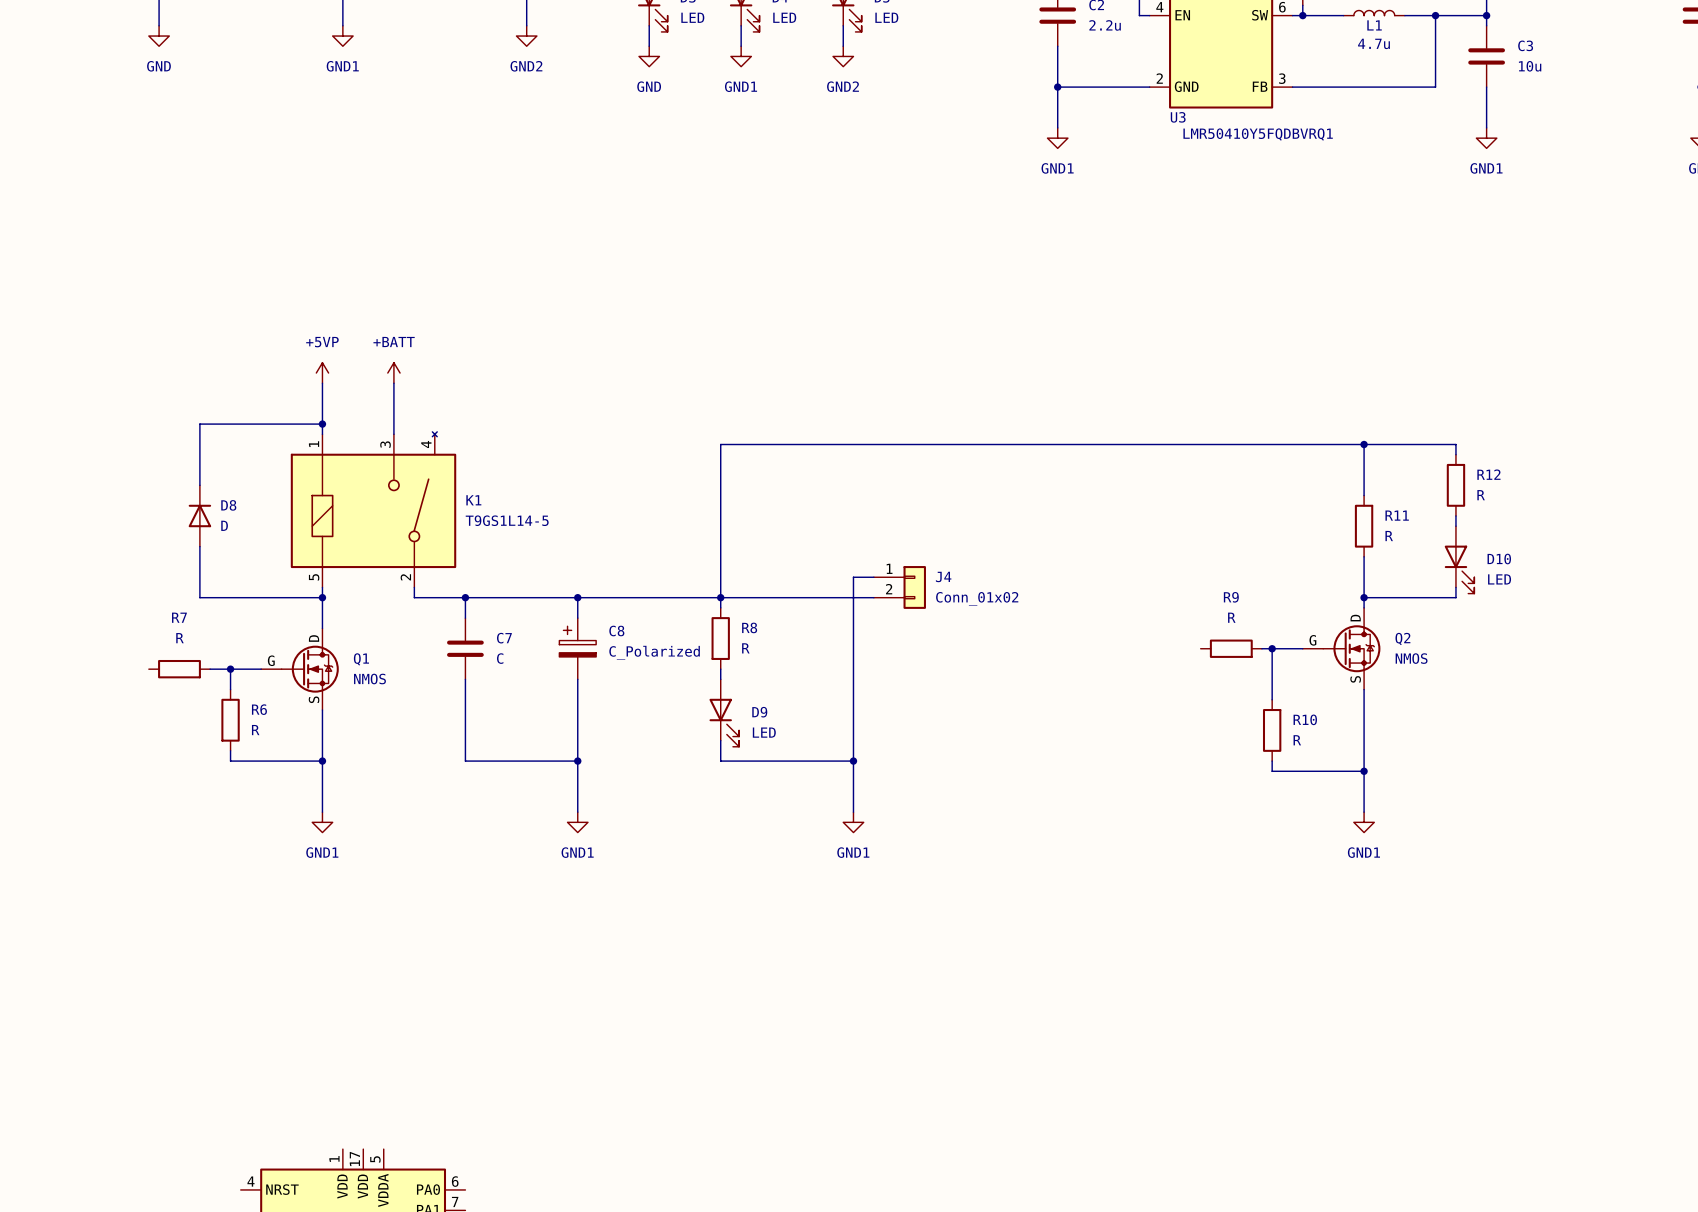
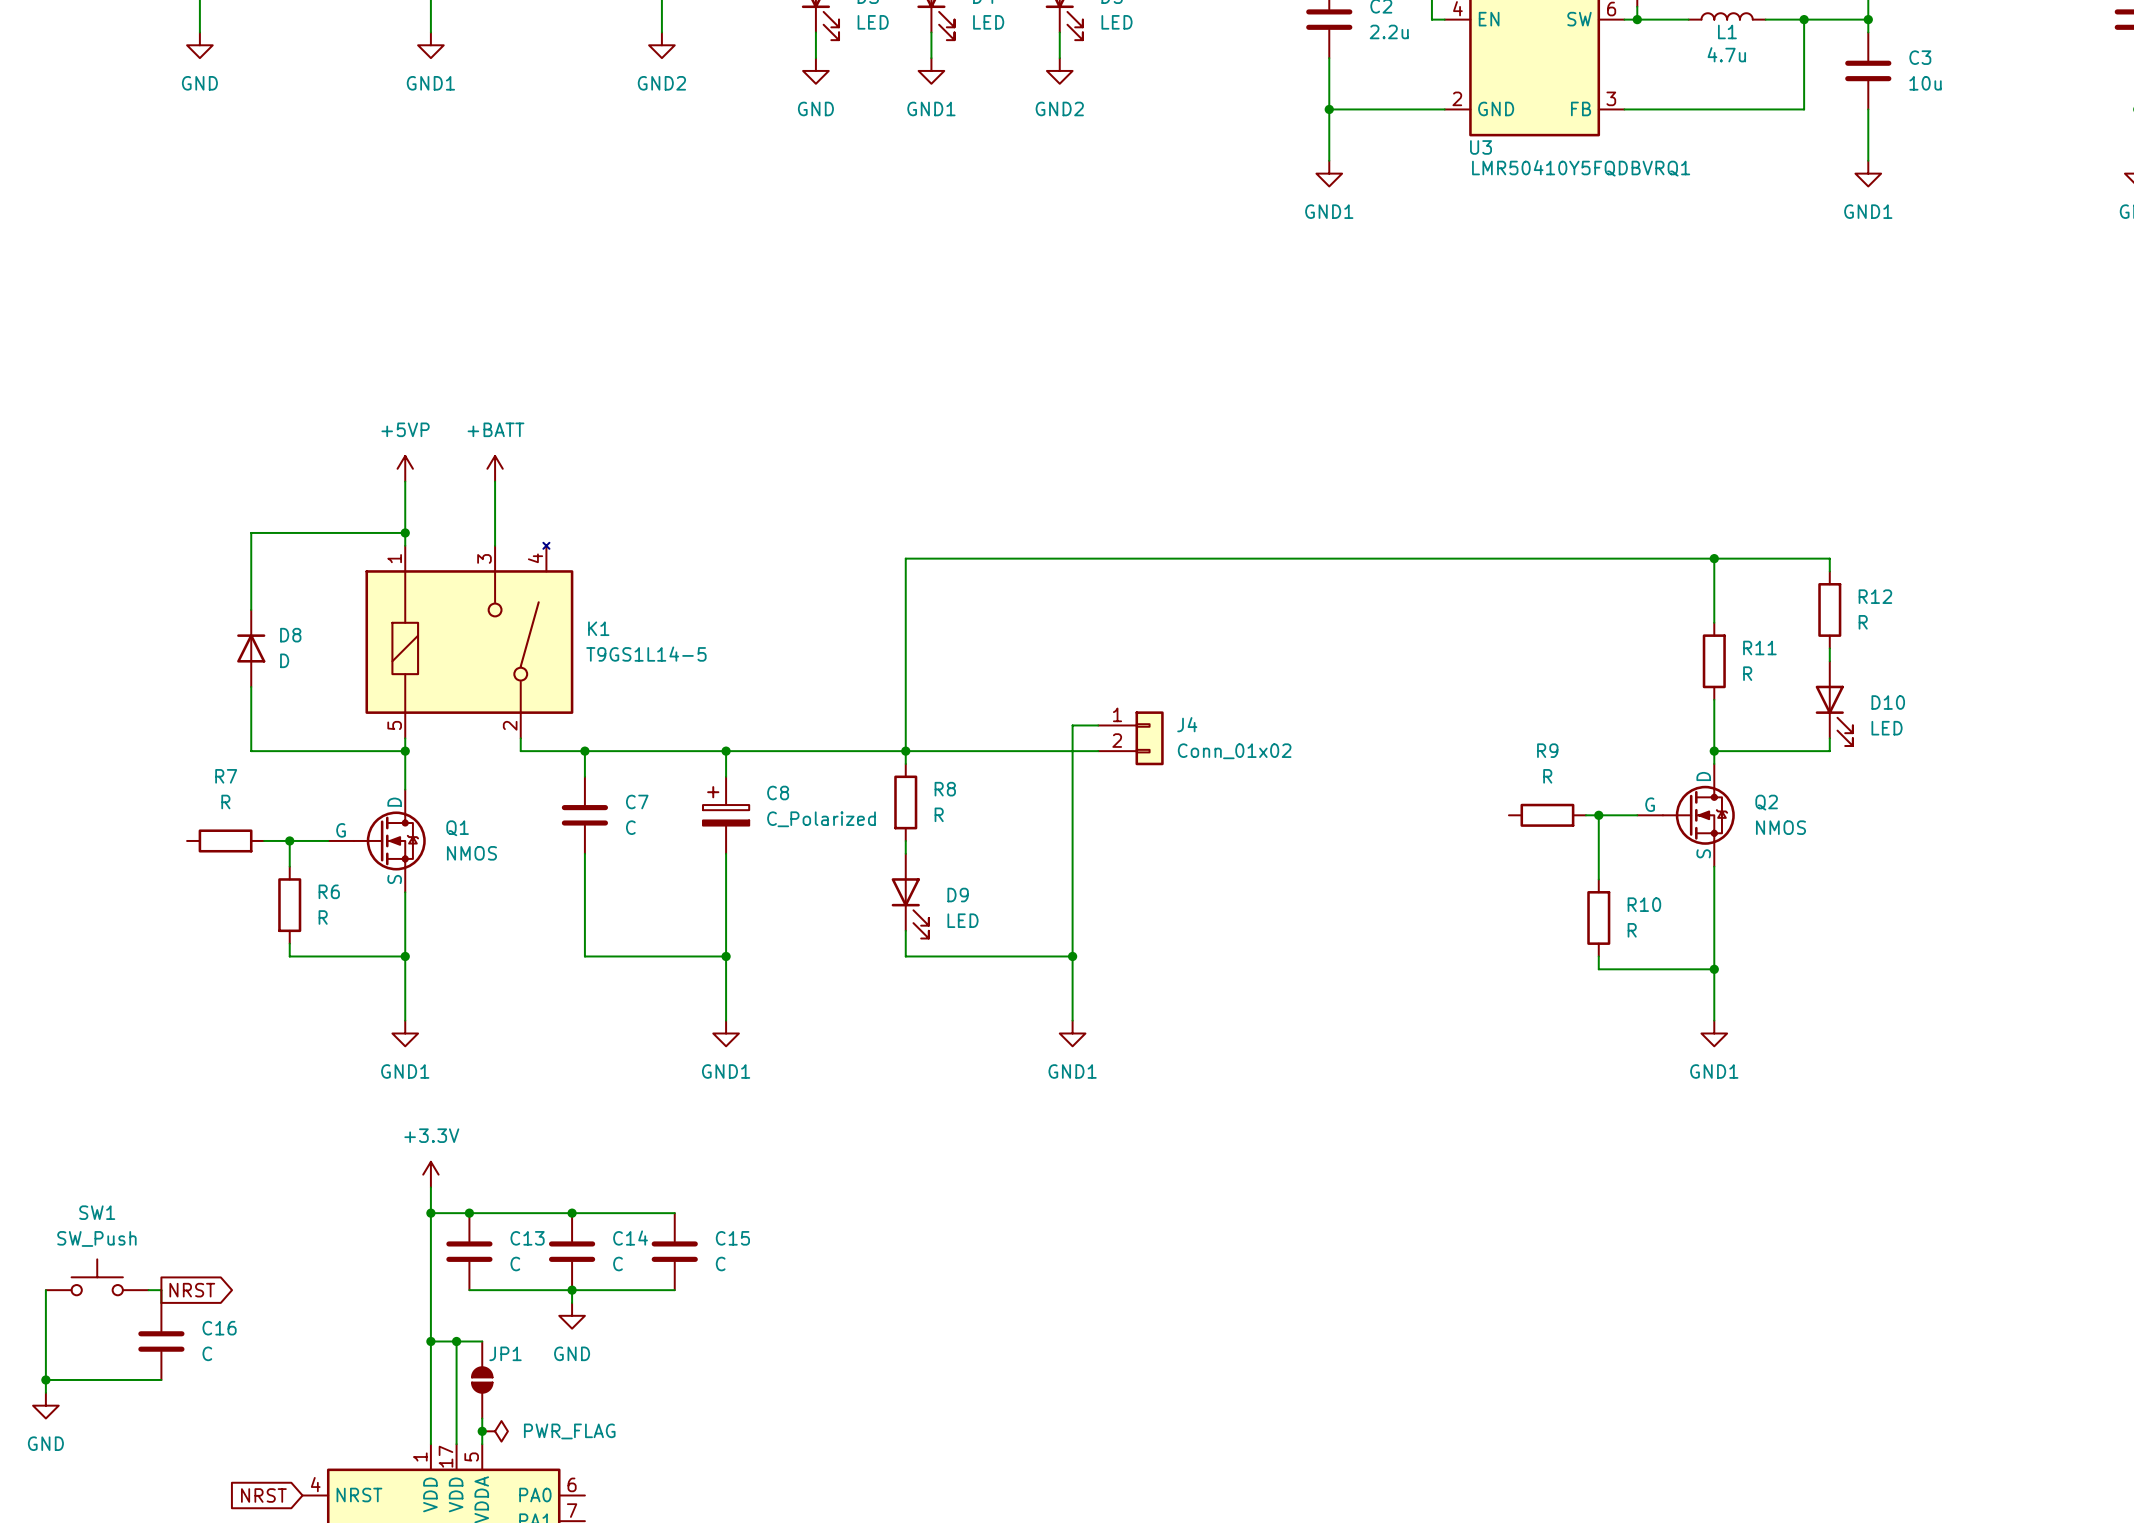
power symbol: none -> +3.3V (430, 1174)
wire: none -> (430, 1187) (430, 1444)
wire: none -> (430, 1213) (674, 1213)
junction: none -> (430, 1213)
junction: none -> (469, 1213)
junction: none -> (572, 1213)
C13: none -> C (469, 1251)
C14: none -> C (572, 1251)
C15: none -> C (674, 1251)
SW1: none -> SW_Push (97, 1277)
wire: none -> (45, 1290) (45, 1392)
wire: none -> (148, 1290) (161, 1290) (161, 1302)
global label: none -> NRST (192, 1290)
wire: none -> (469, 1290) (674, 1290)
wire: none -> (572, 1290) (572, 1302)
junction: none -> (572, 1290)
power symbol: none -> GND (572, 1315)
C16: none -> C (161, 1341)
wire: none -> (430, 1341) (482, 1341)
junction: none -> (430, 1341)
wire: none -> (456, 1341) (456, 1444)
junction: none -> (456, 1341)
wire: none -> (45, 1379) (161, 1379)
junction: none -> (45, 1379)
JP1: none -> (482, 1379)
power symbol: none -> GND (45, 1405)
wire: none -> (482, 1418) (482, 1444)
junction: none -> (482, 1431)
power symbol: none -> PWR_FLAG (495, 1431)
global label: none -> NRST (263, 1495)

